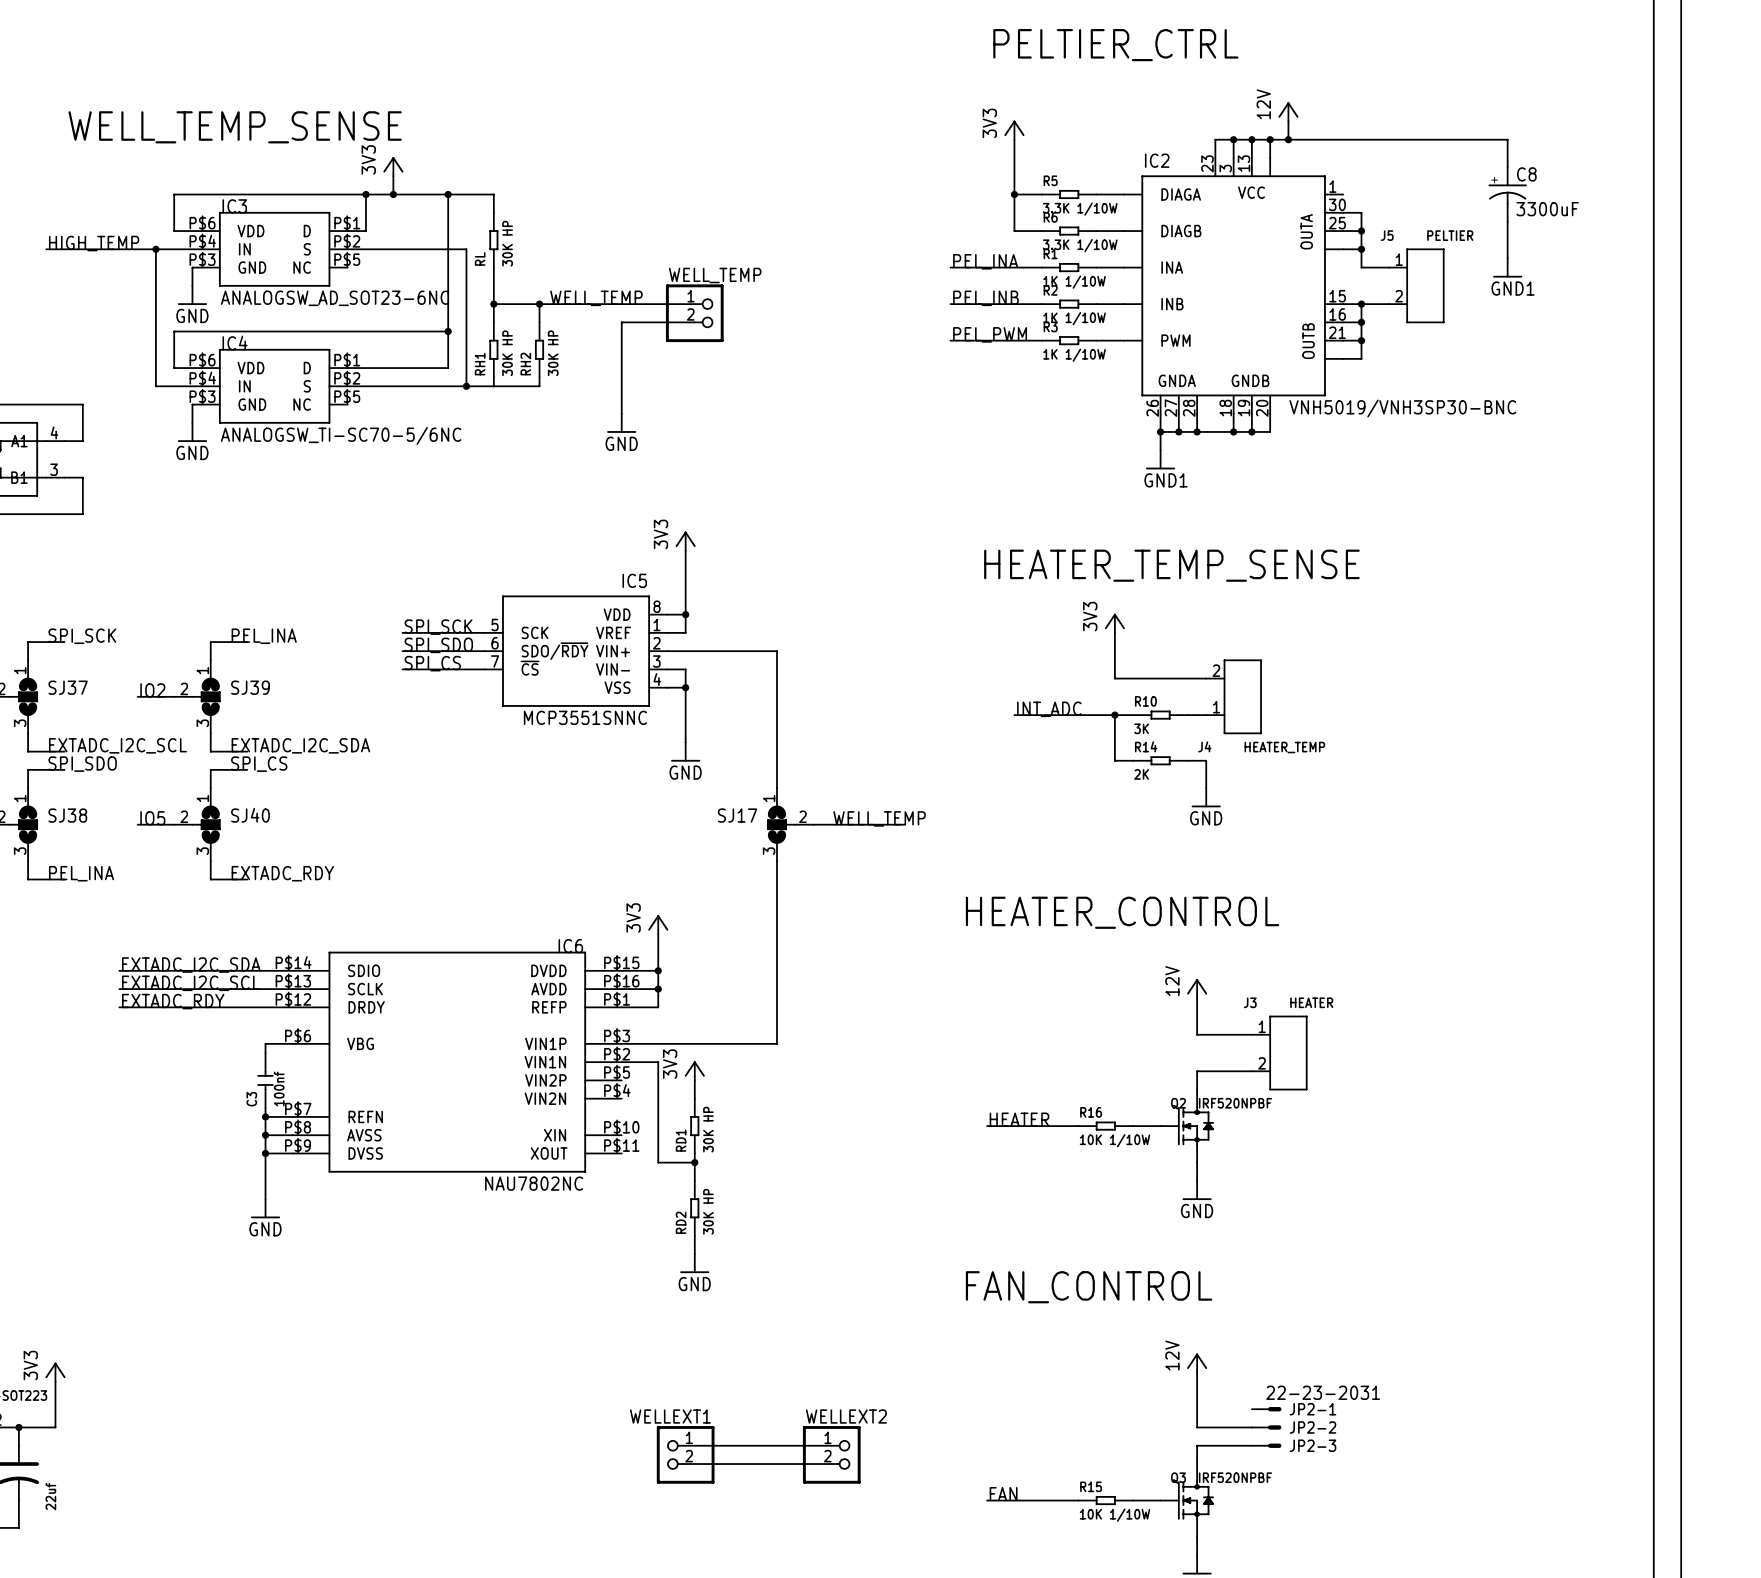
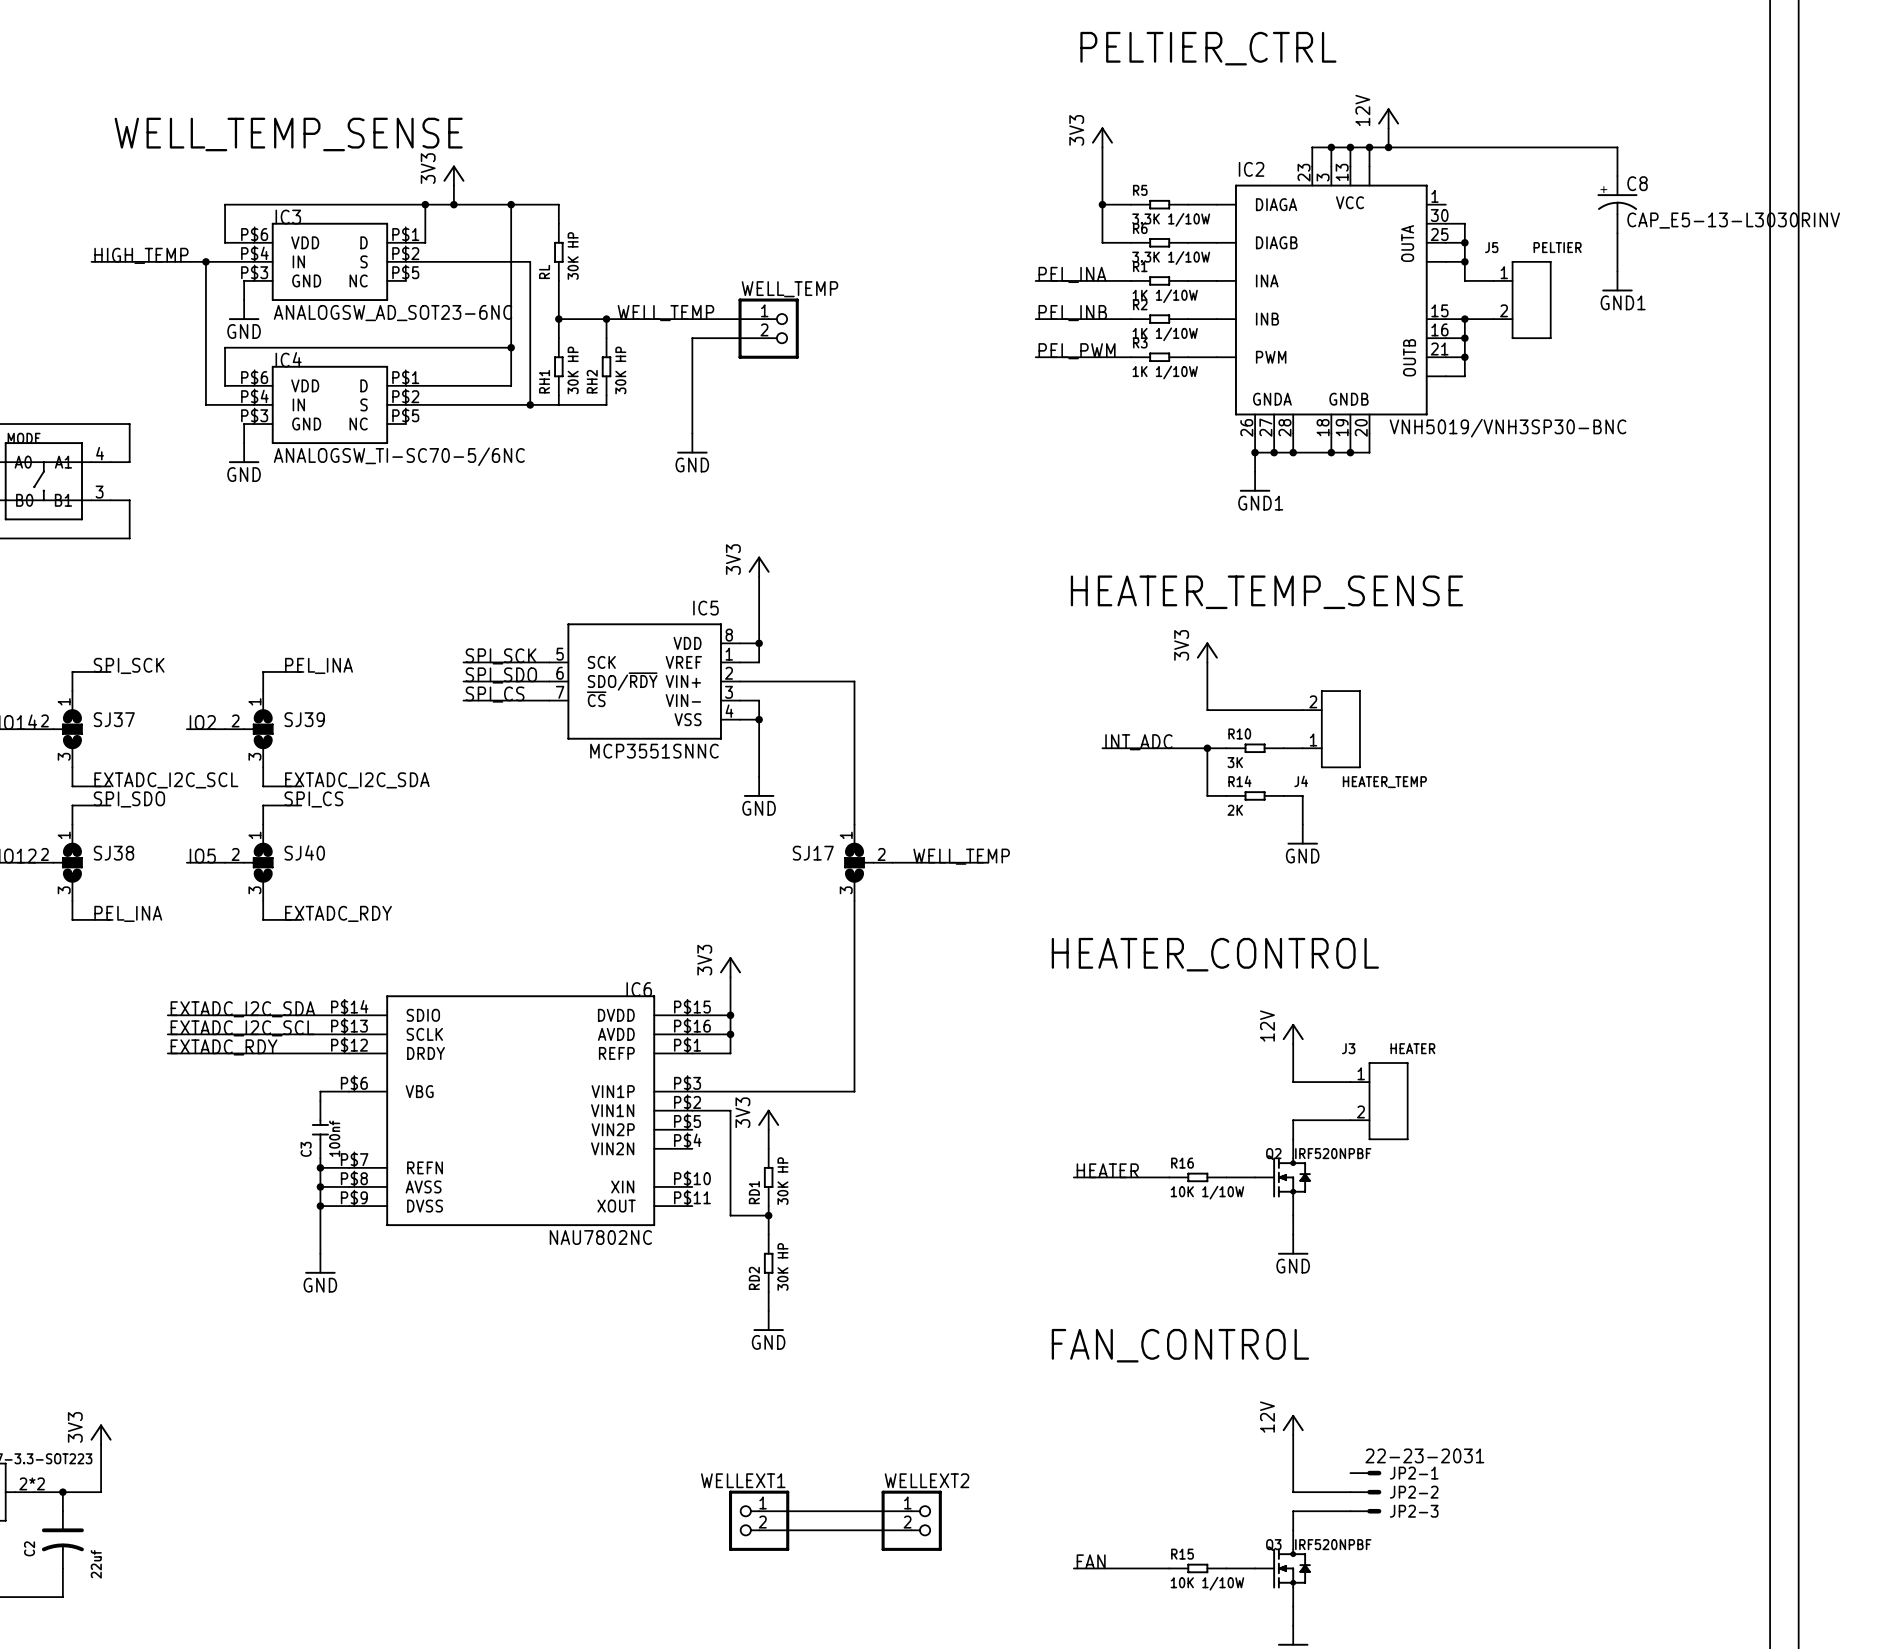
C8 value: 3300uF (1547, 209) -> CAP_E5-13-L3030RINV (1733, 220)

